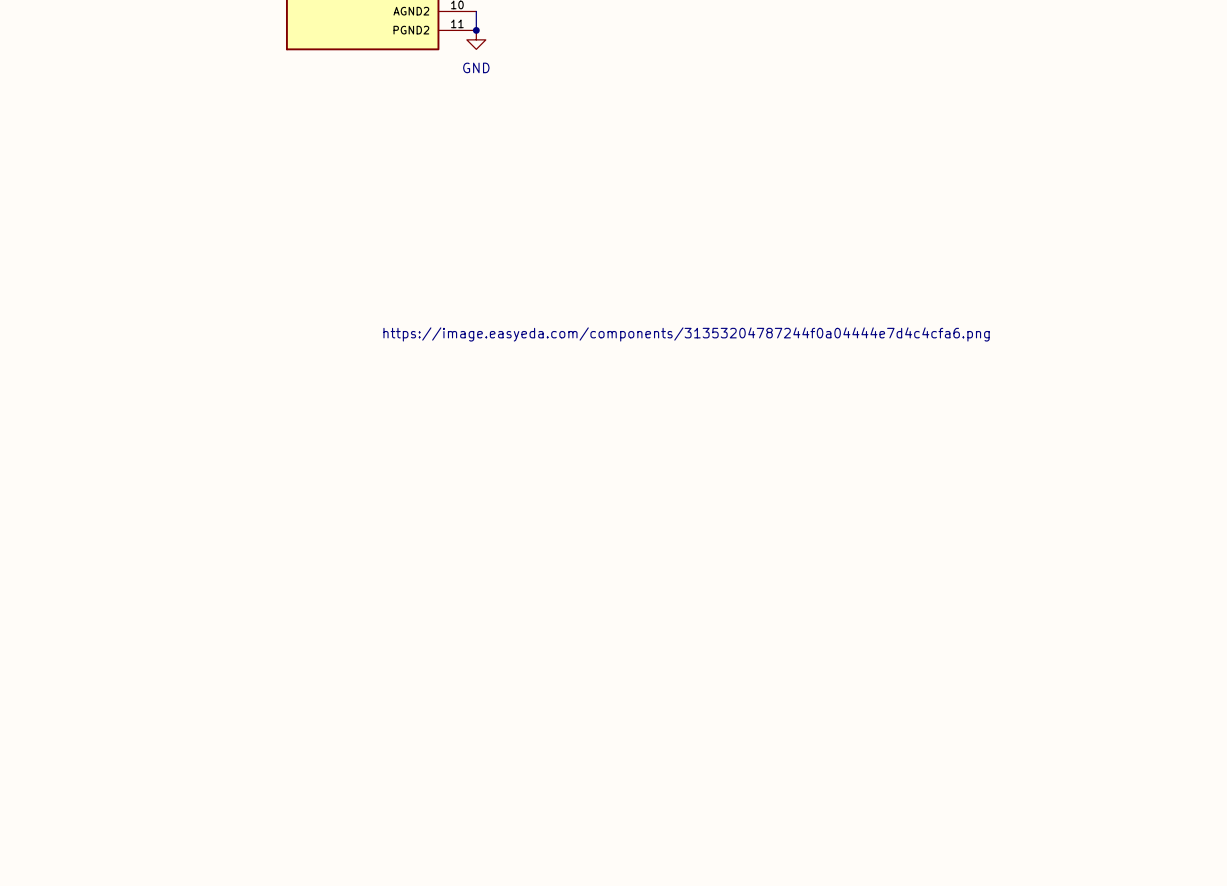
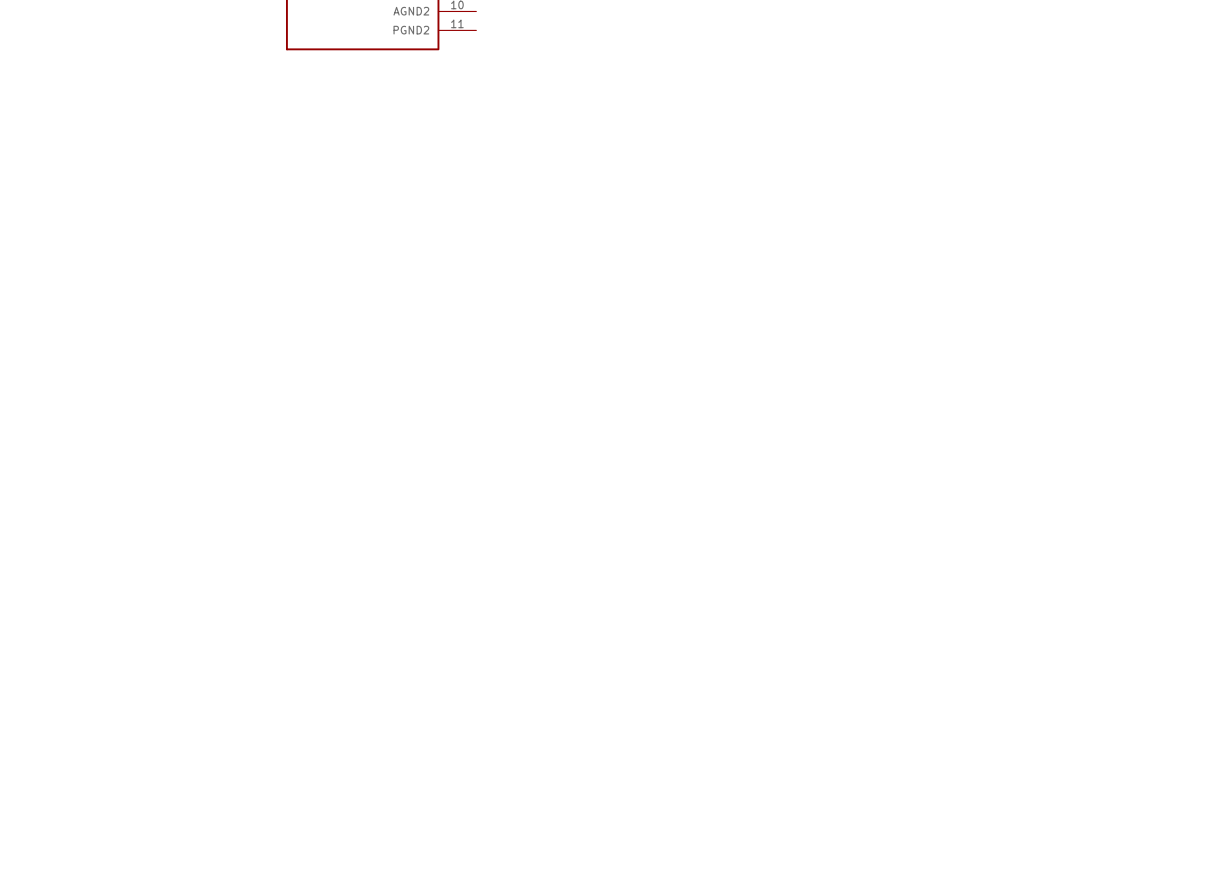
wire: (476, 11) (476, 30) -> none
junction: (476, 30) -> none
power symbol: GND (476, 39) -> none
text: https://image.easyeda.com/components/31353204787244f0a04444e7d4c4cfa6.png (686, 334) -> none

